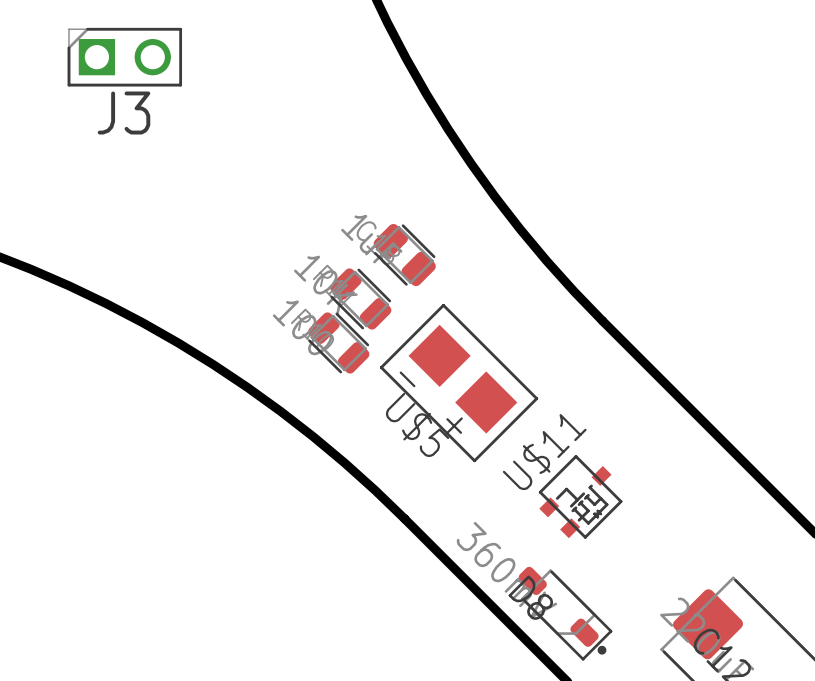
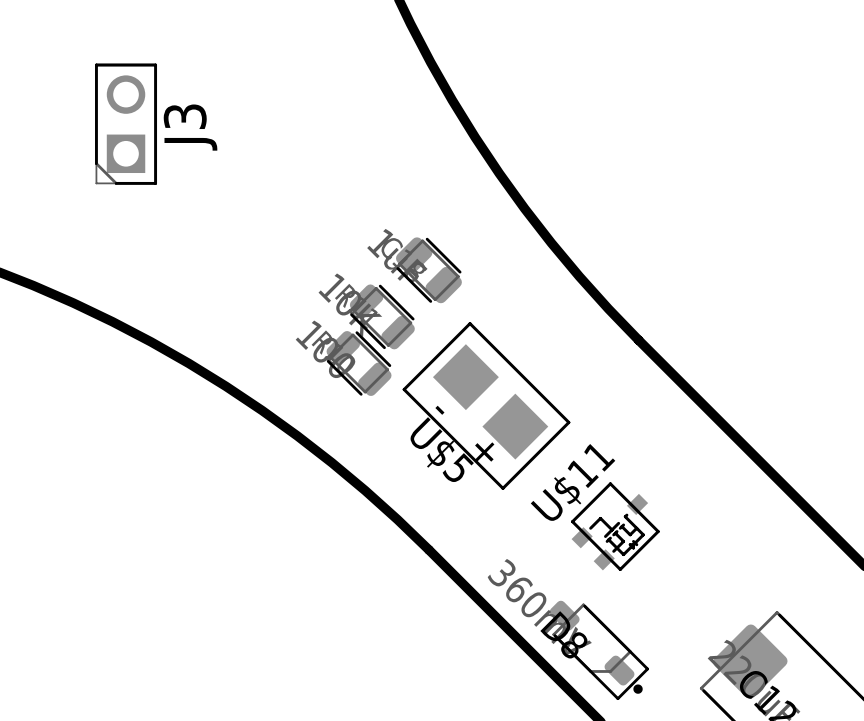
J3 rotation: 0° (124, 57) -> 90° counterclockwise (126, 124)

